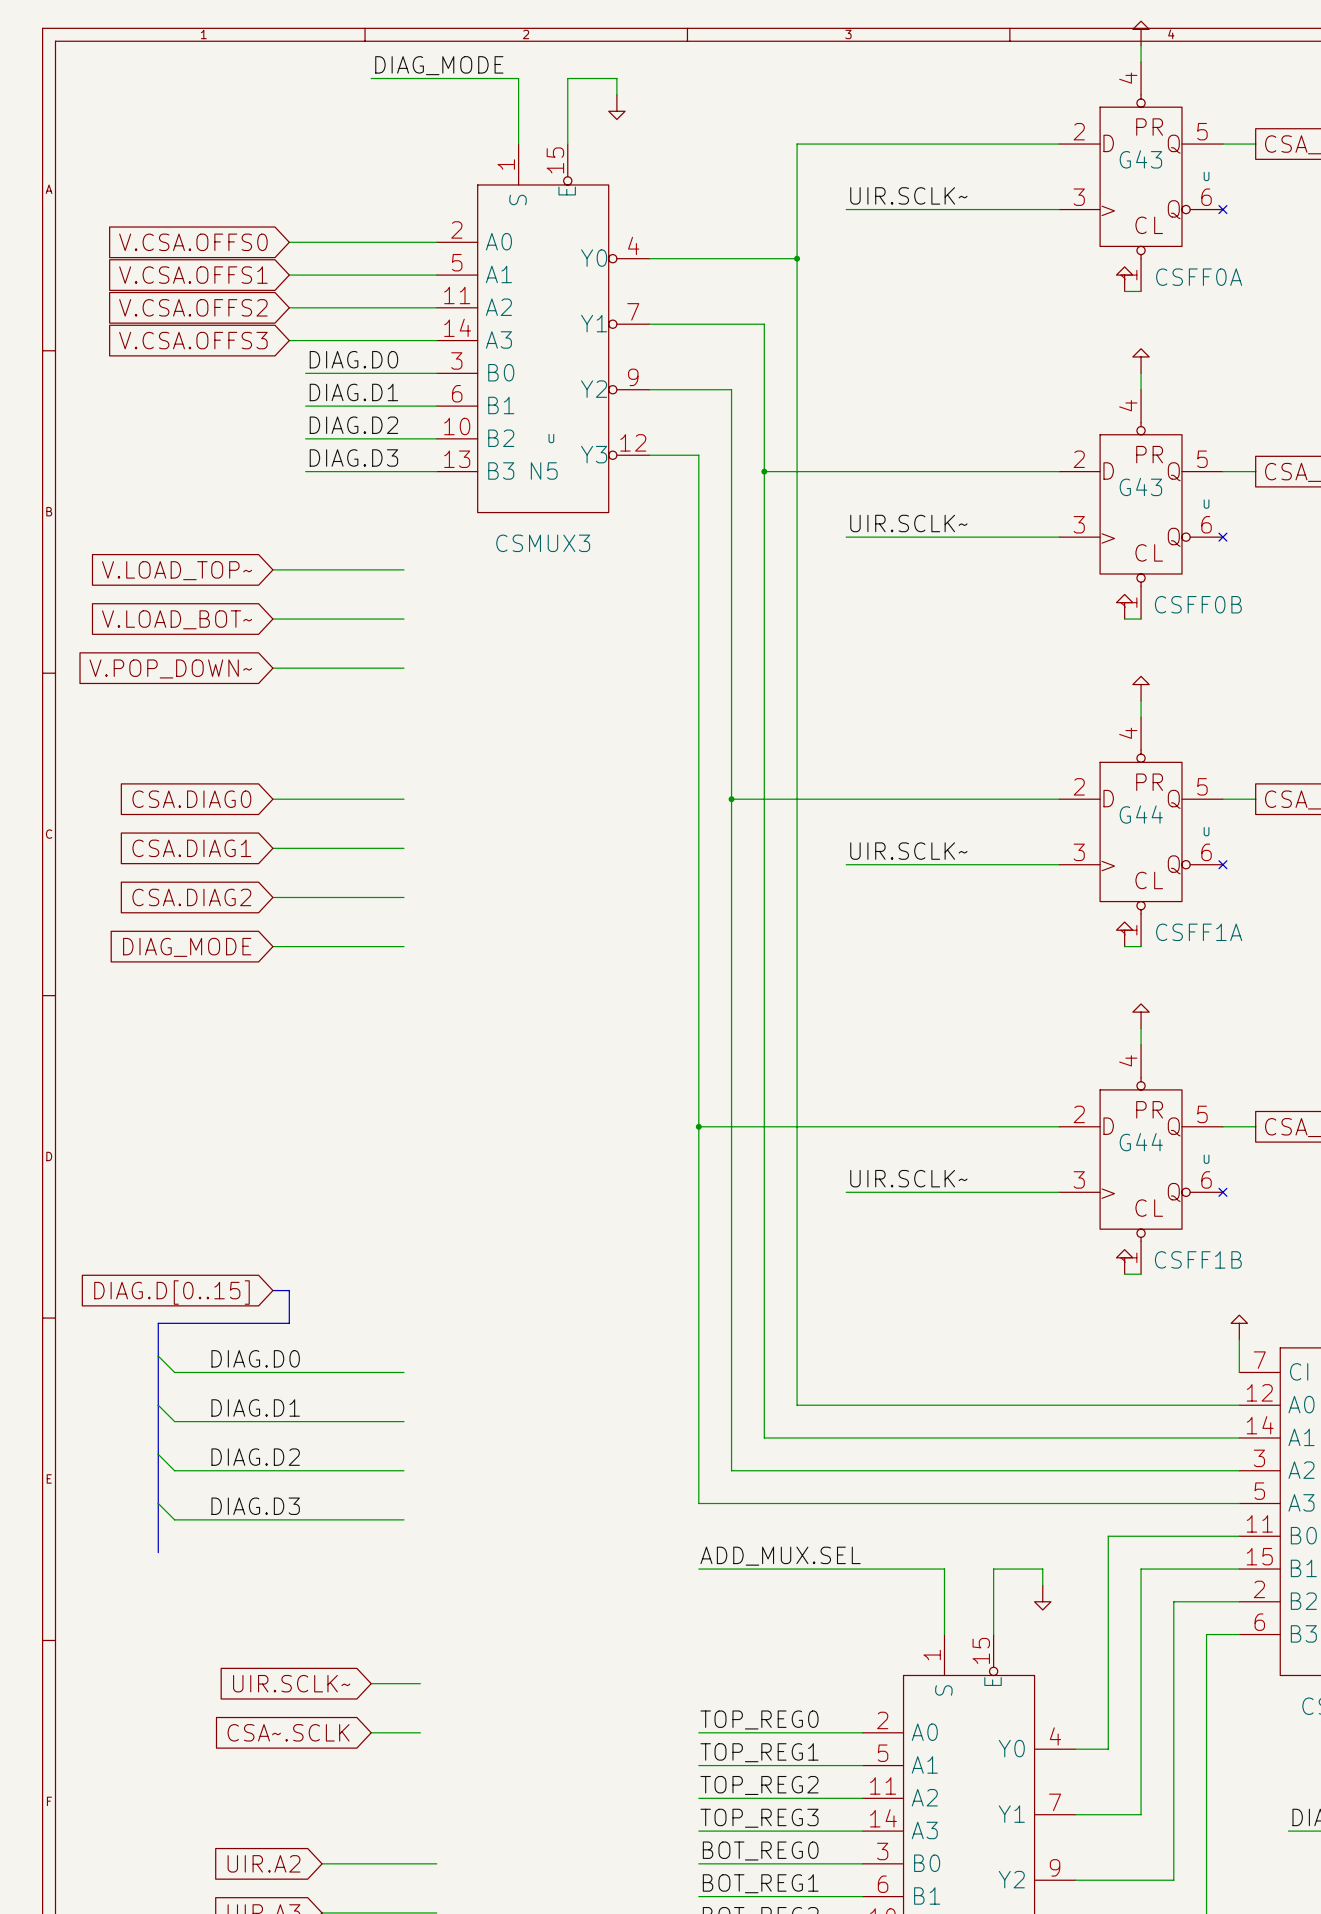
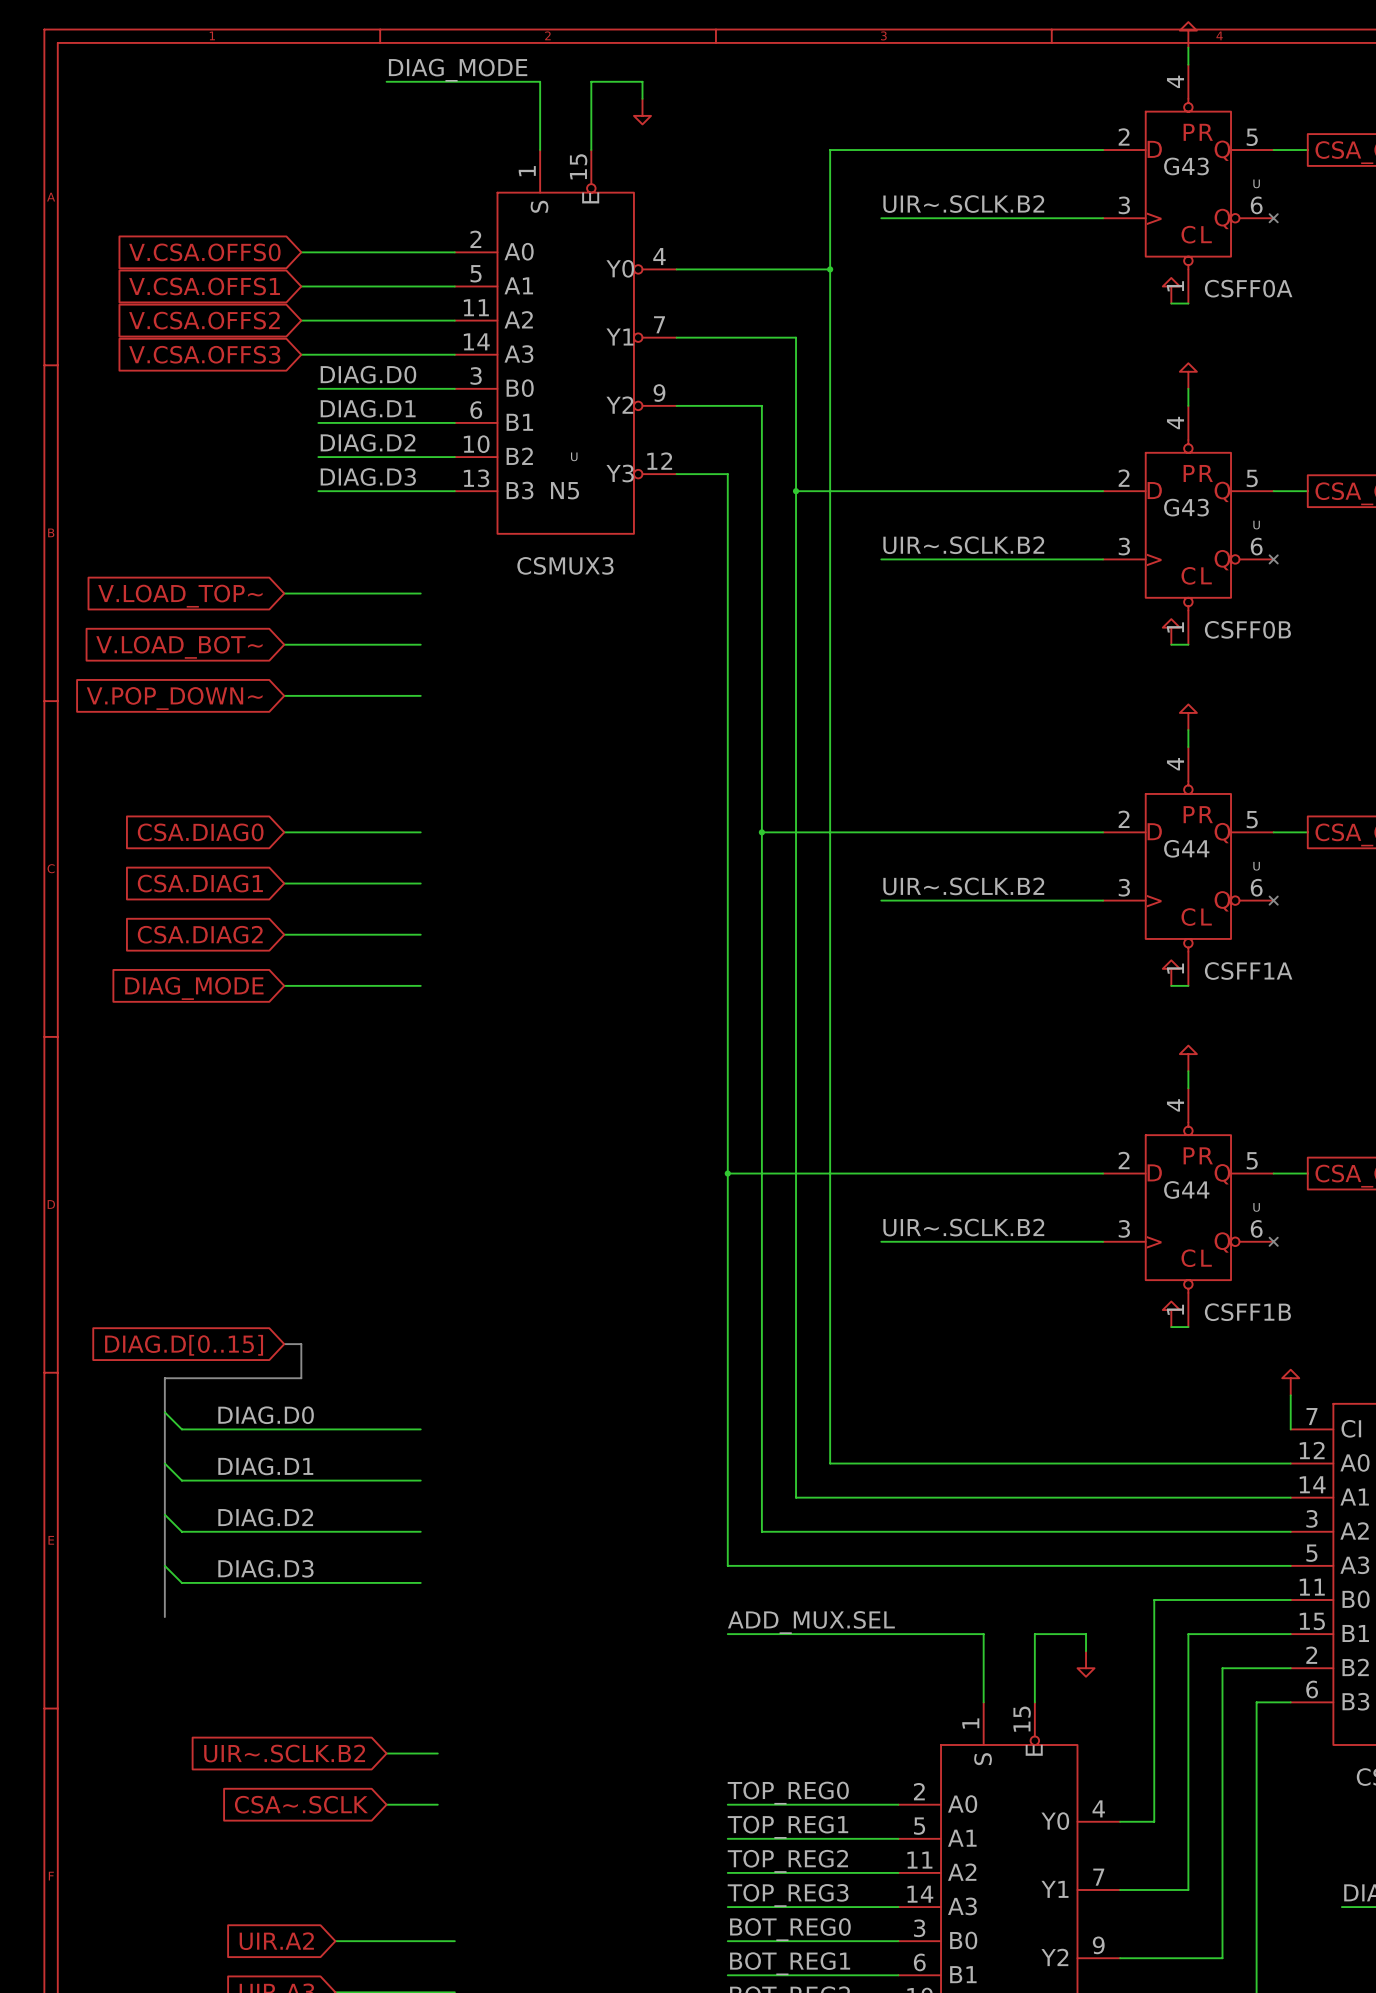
label: UIR.SCLK~ (908, 195) -> UIR~.SCLK.B2 (963, 204)
label: UIR.SCLK~ (908, 523) -> UIR~.SCLK.B2 (963, 545)
label: UIR.SCLK~ (908, 851) -> UIR~.SCLK.B2 (963, 886)
label: UIR.SCLK~ (908, 1178) -> UIR~.SCLK.B2 (963, 1227)
global label: UIR.SCLK~ (291, 1683) -> UIR~.SCLK.B2 (284, 1753)

